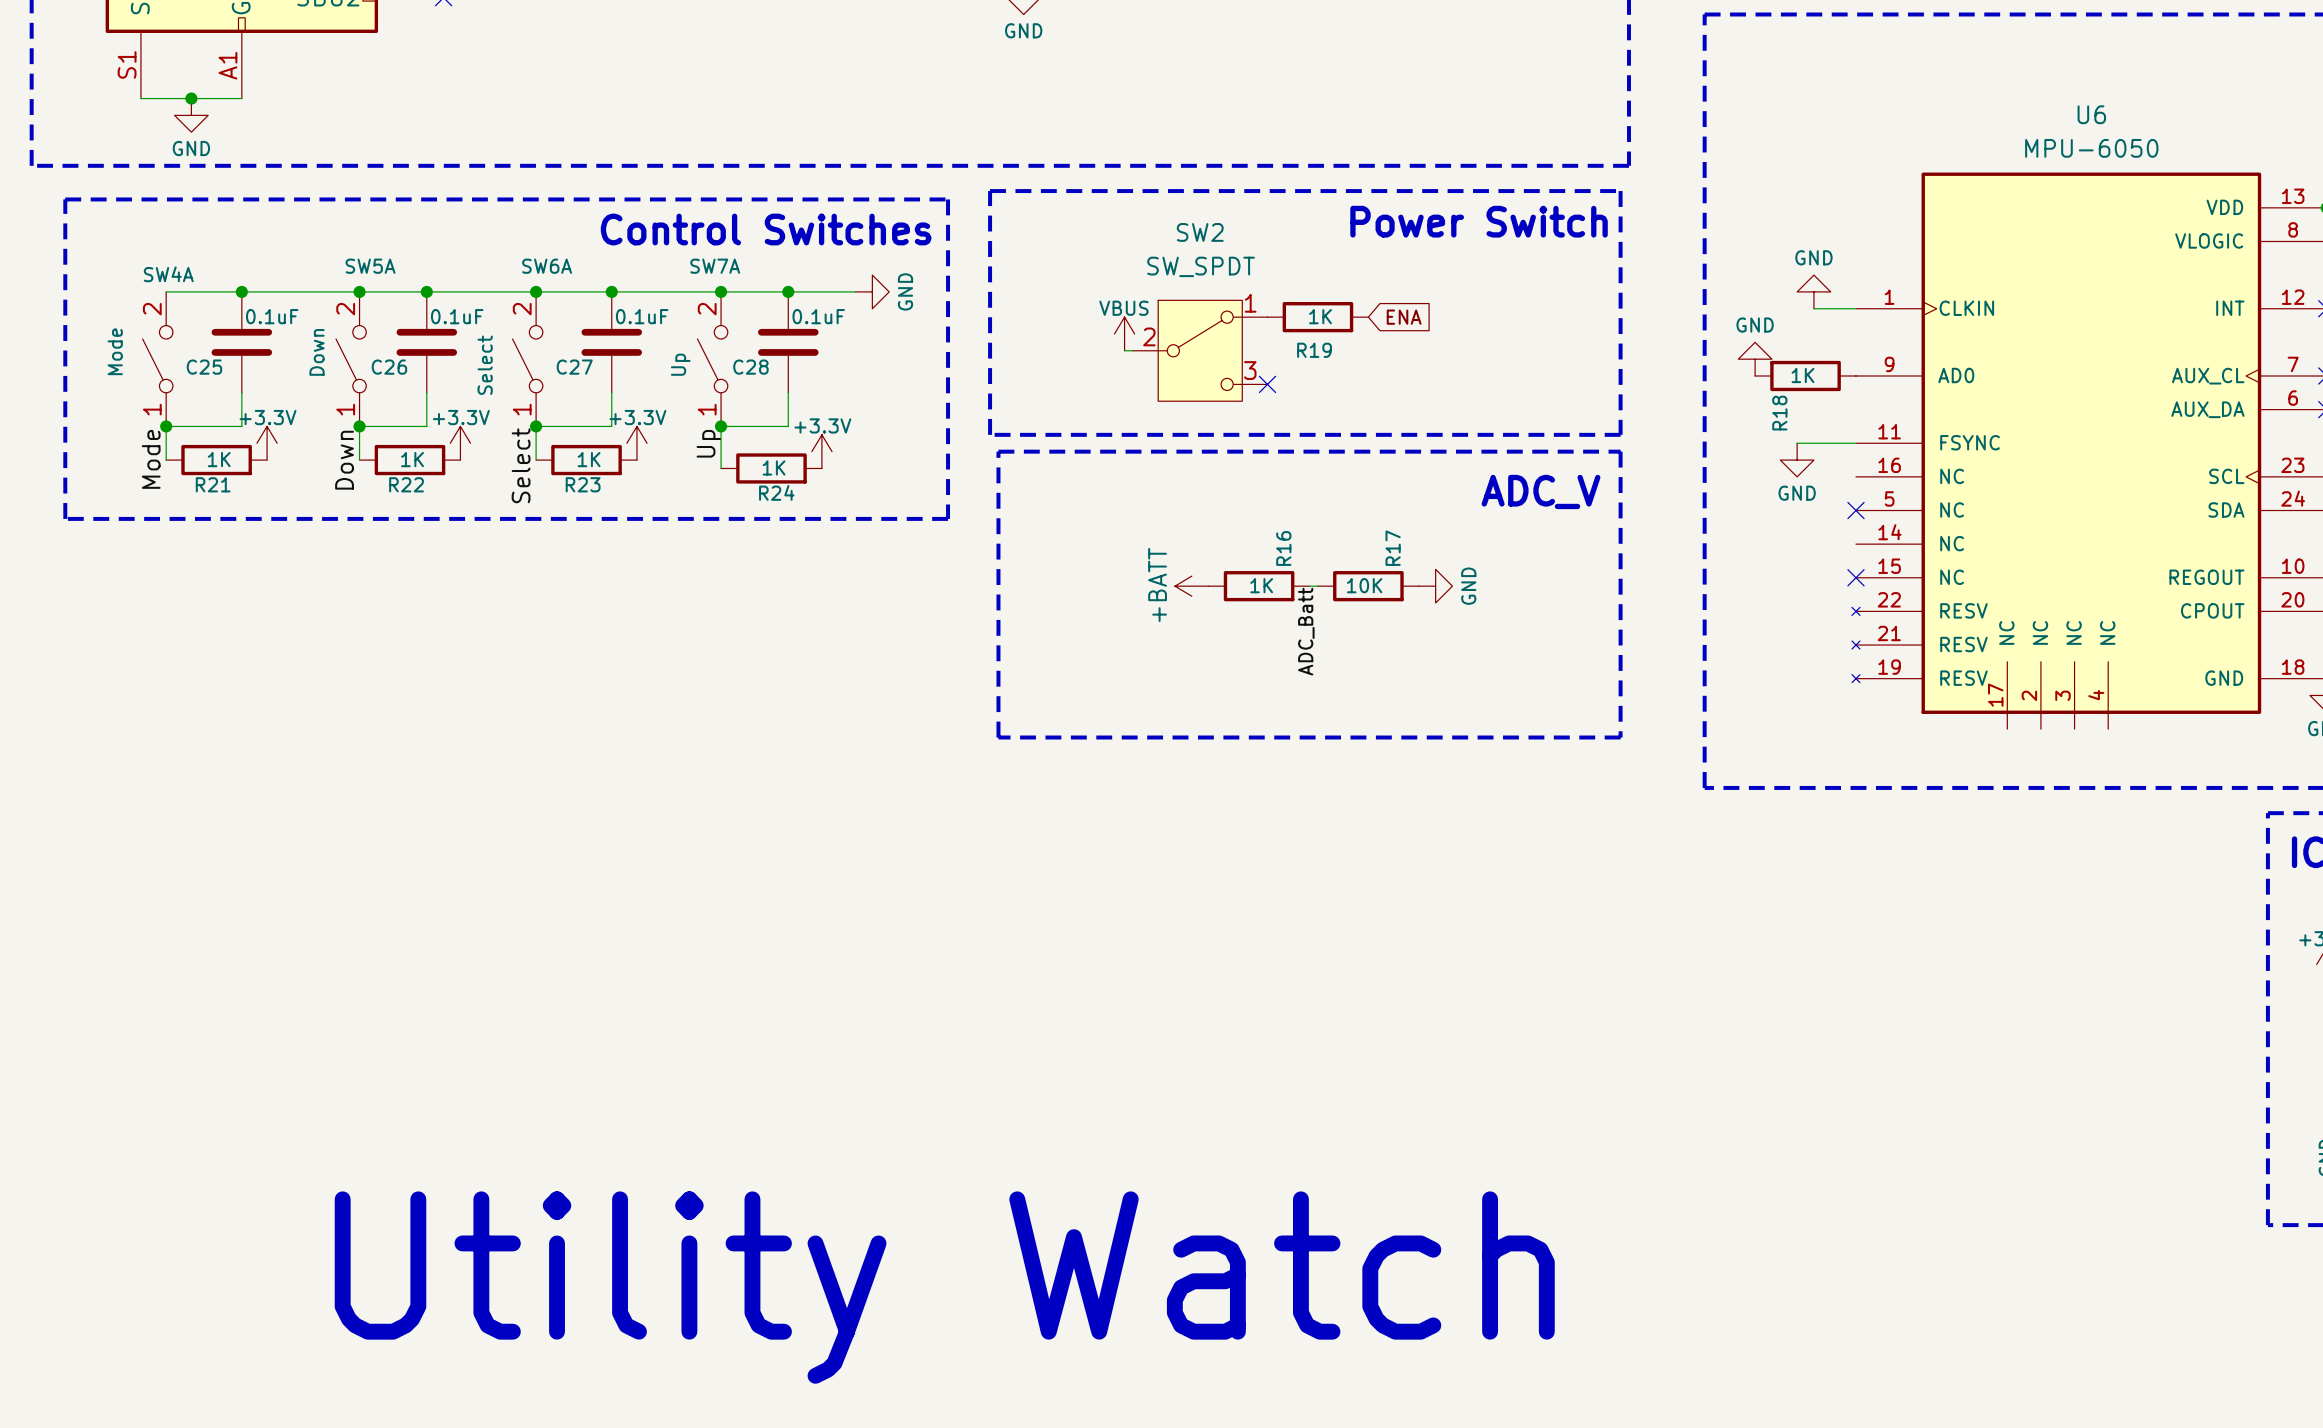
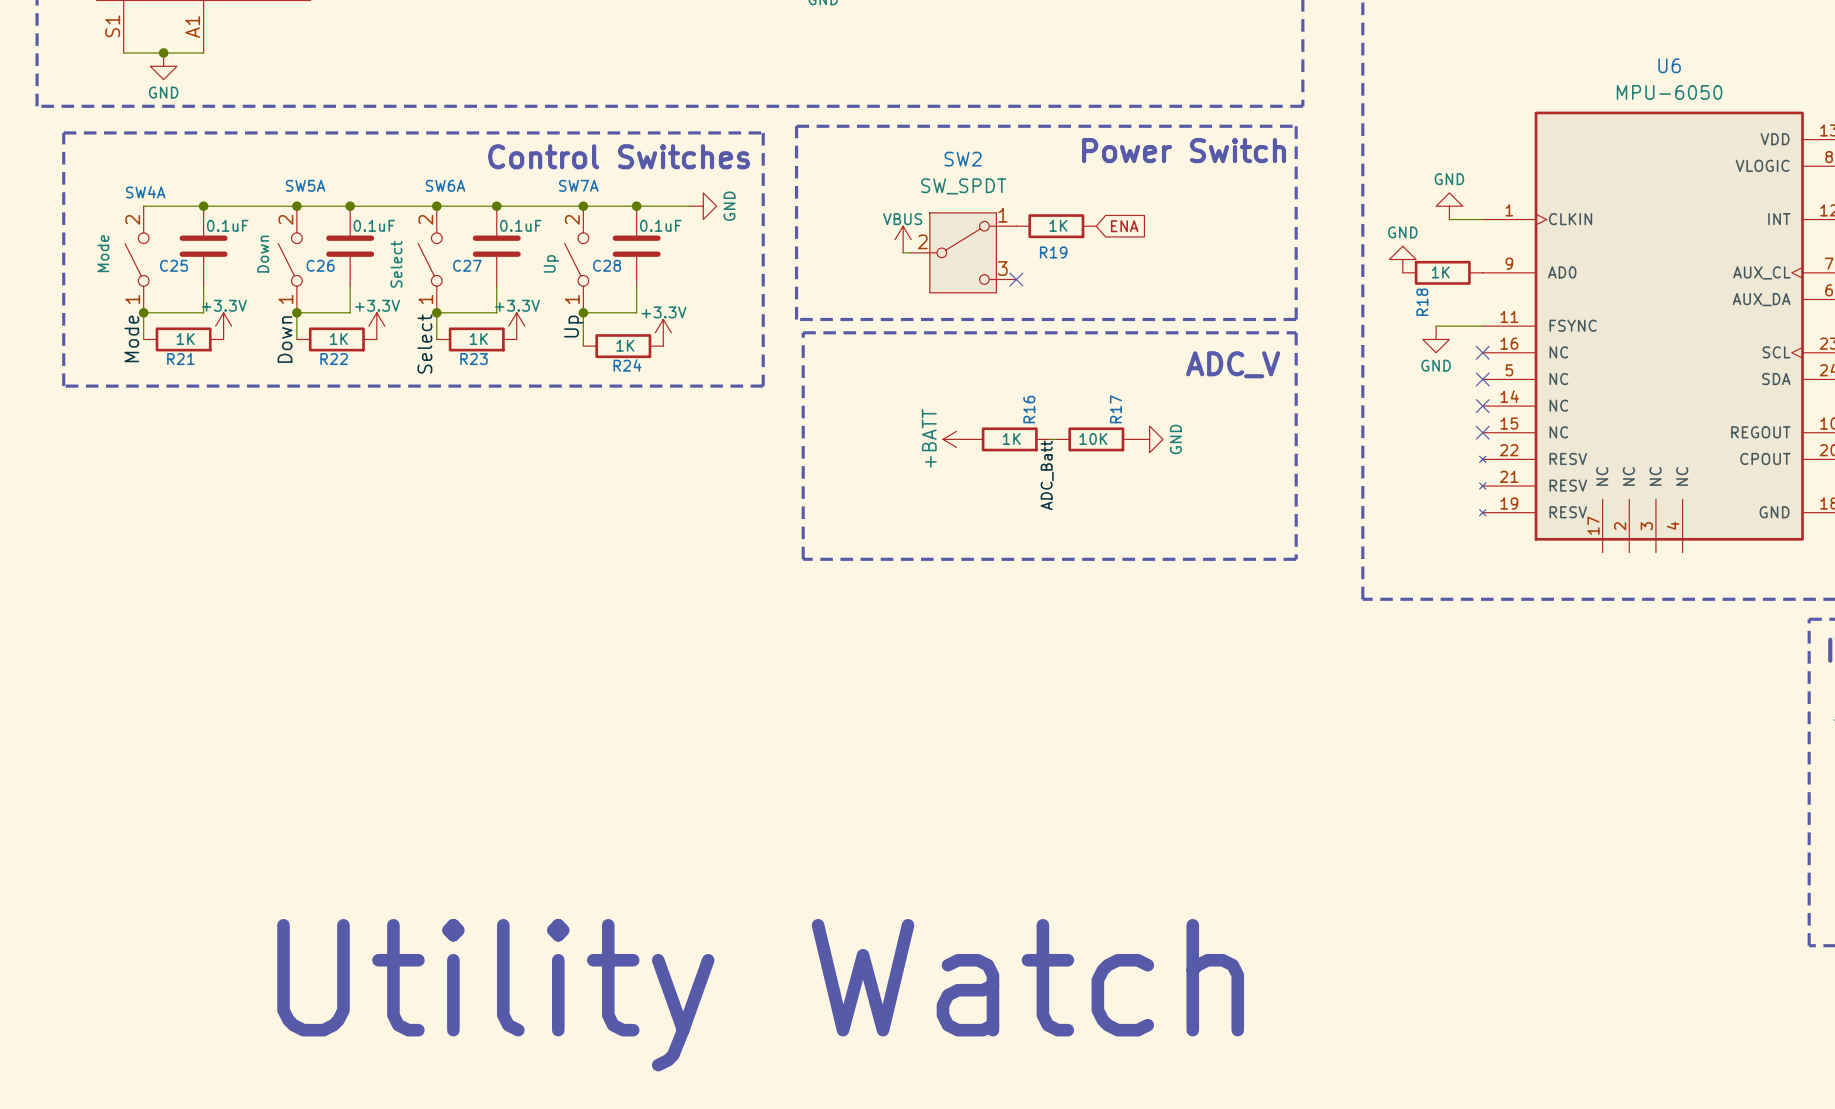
no-connect mark: none -> (1482, 352)
no-connect mark: none -> (1482, 406)

